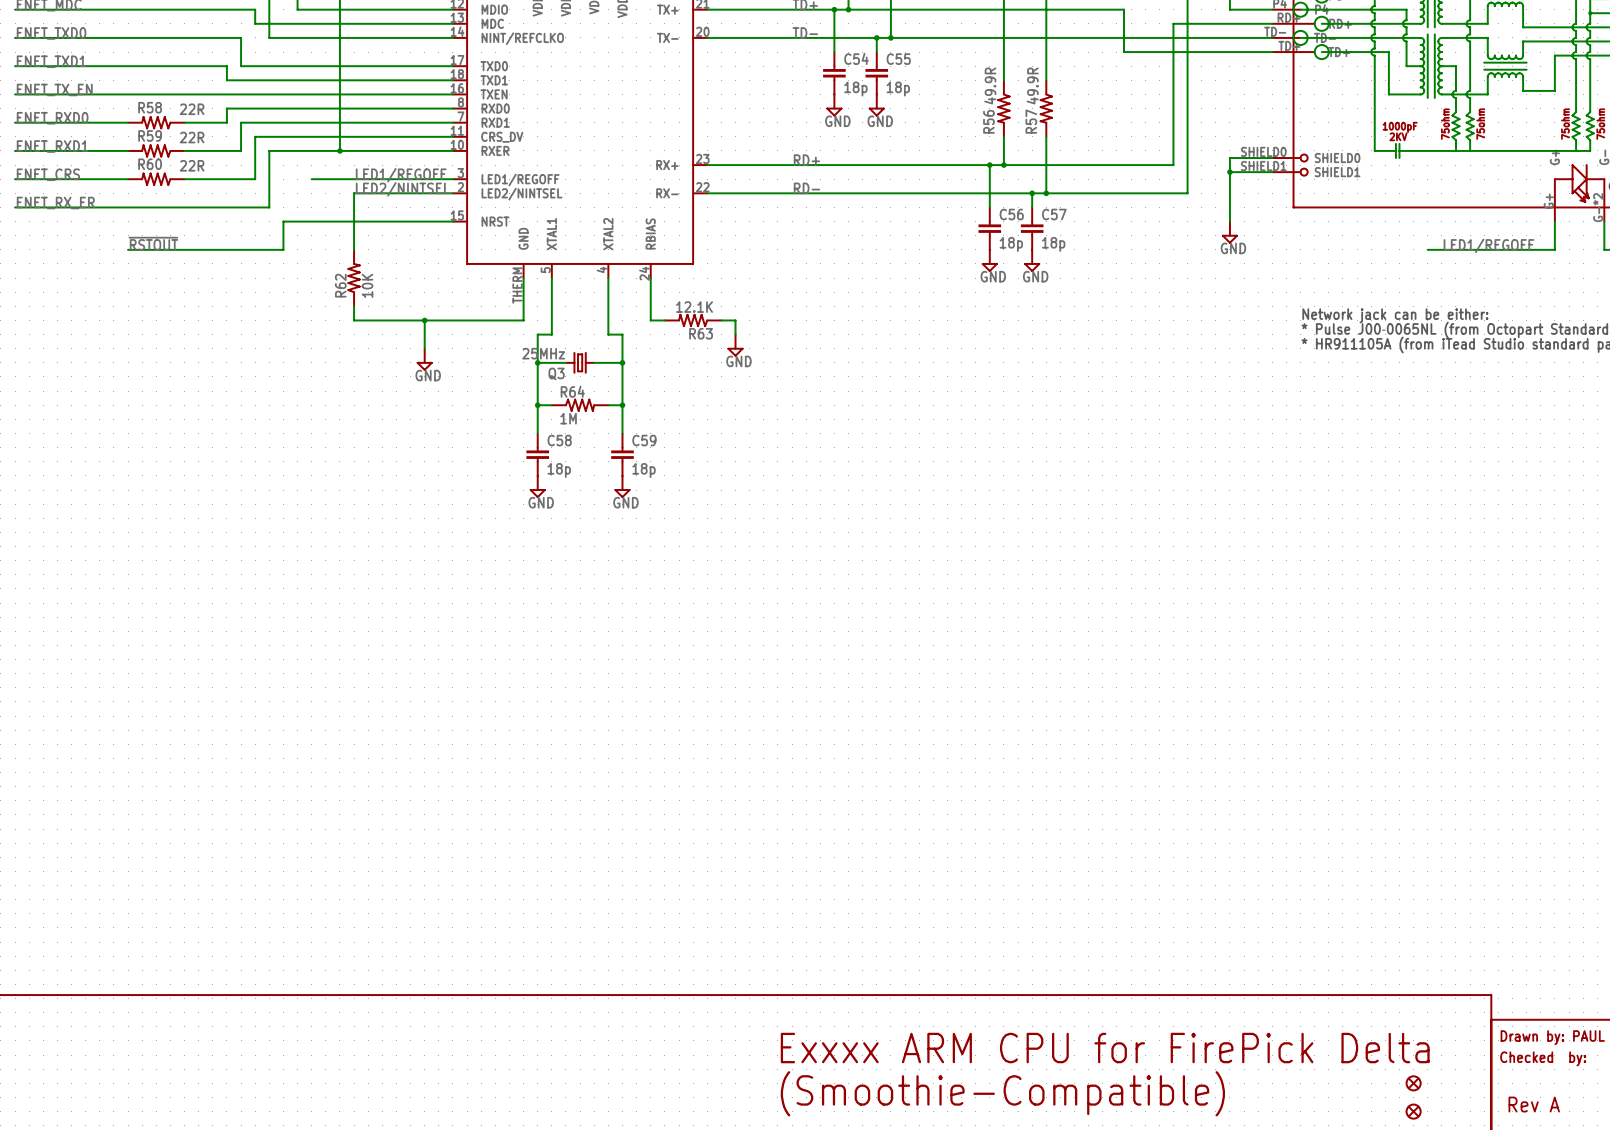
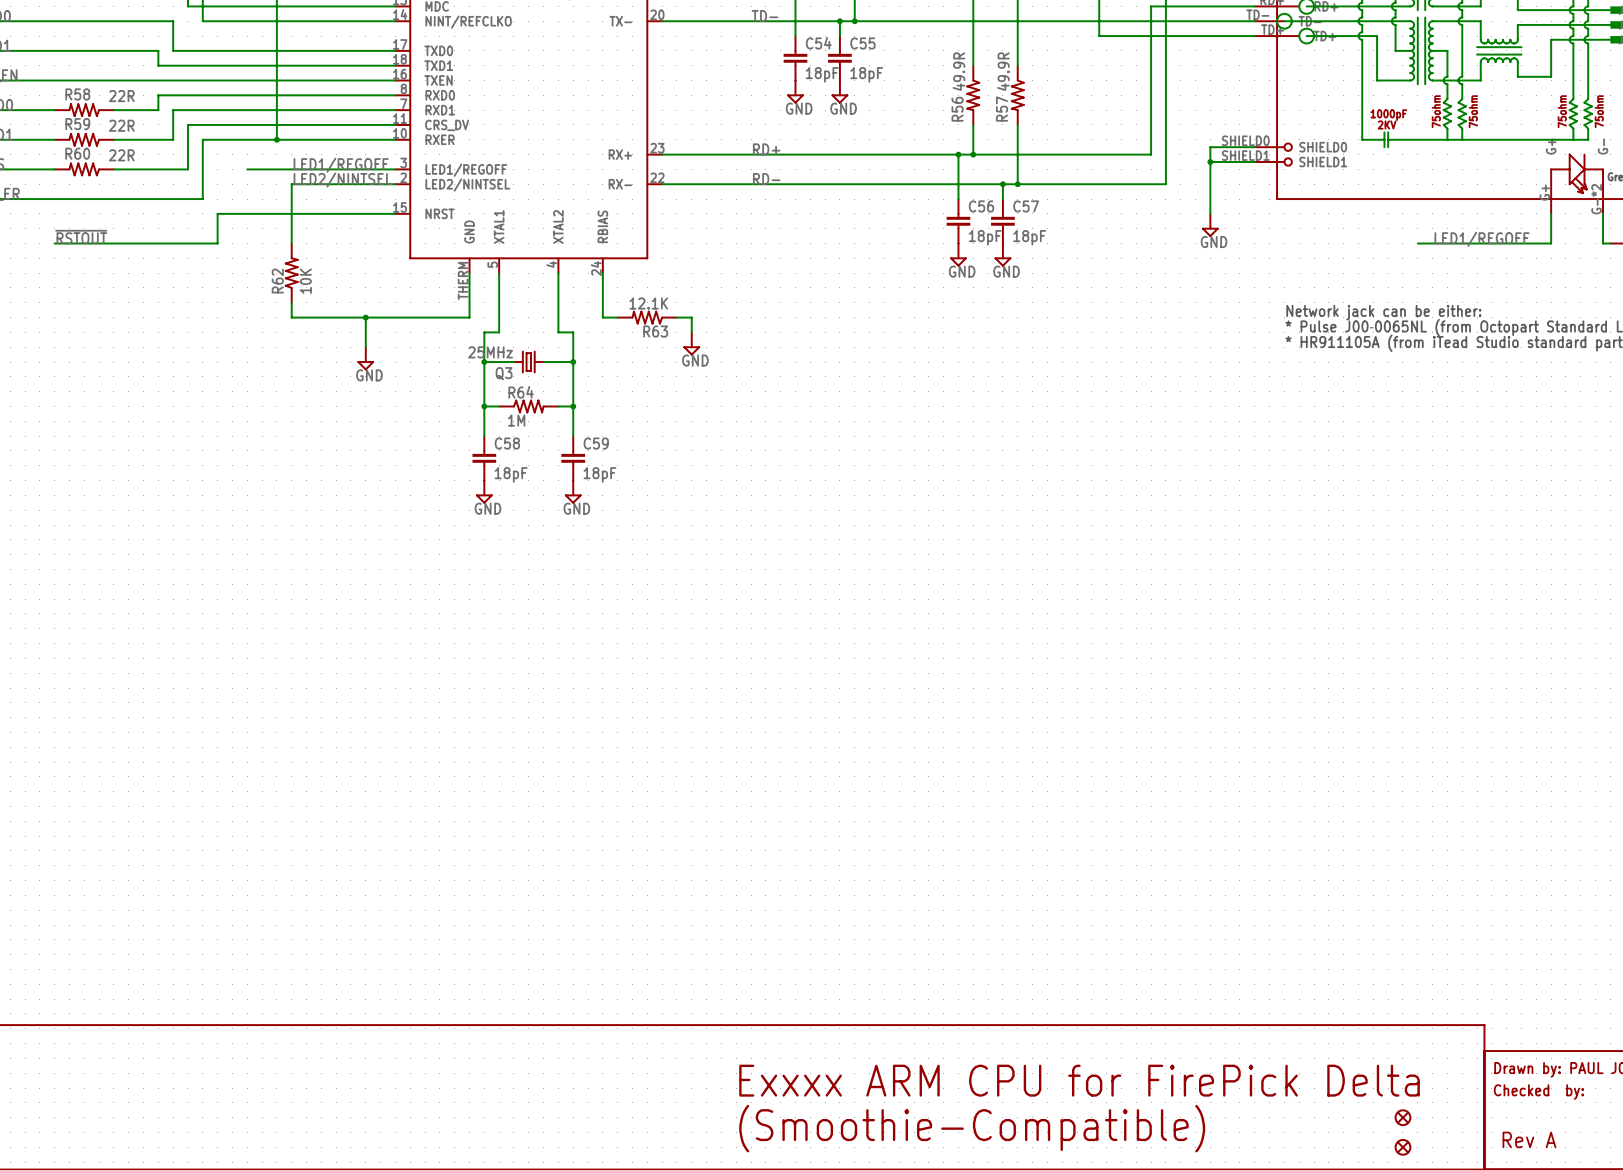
C54 value: 18p (855, 89) -> 18pF (822, 74)
C55 value: 18p (898, 89) -> 18pF (866, 74)
C56 value: 18p (1011, 244) -> 18pF (985, 237)
C57 value: 18p (1053, 244) -> 18pF (1029, 237)
C58 value: 18p (559, 470) -> 18pF (511, 474)
C59 value: 18p (643, 470) -> 18pF (600, 474)

